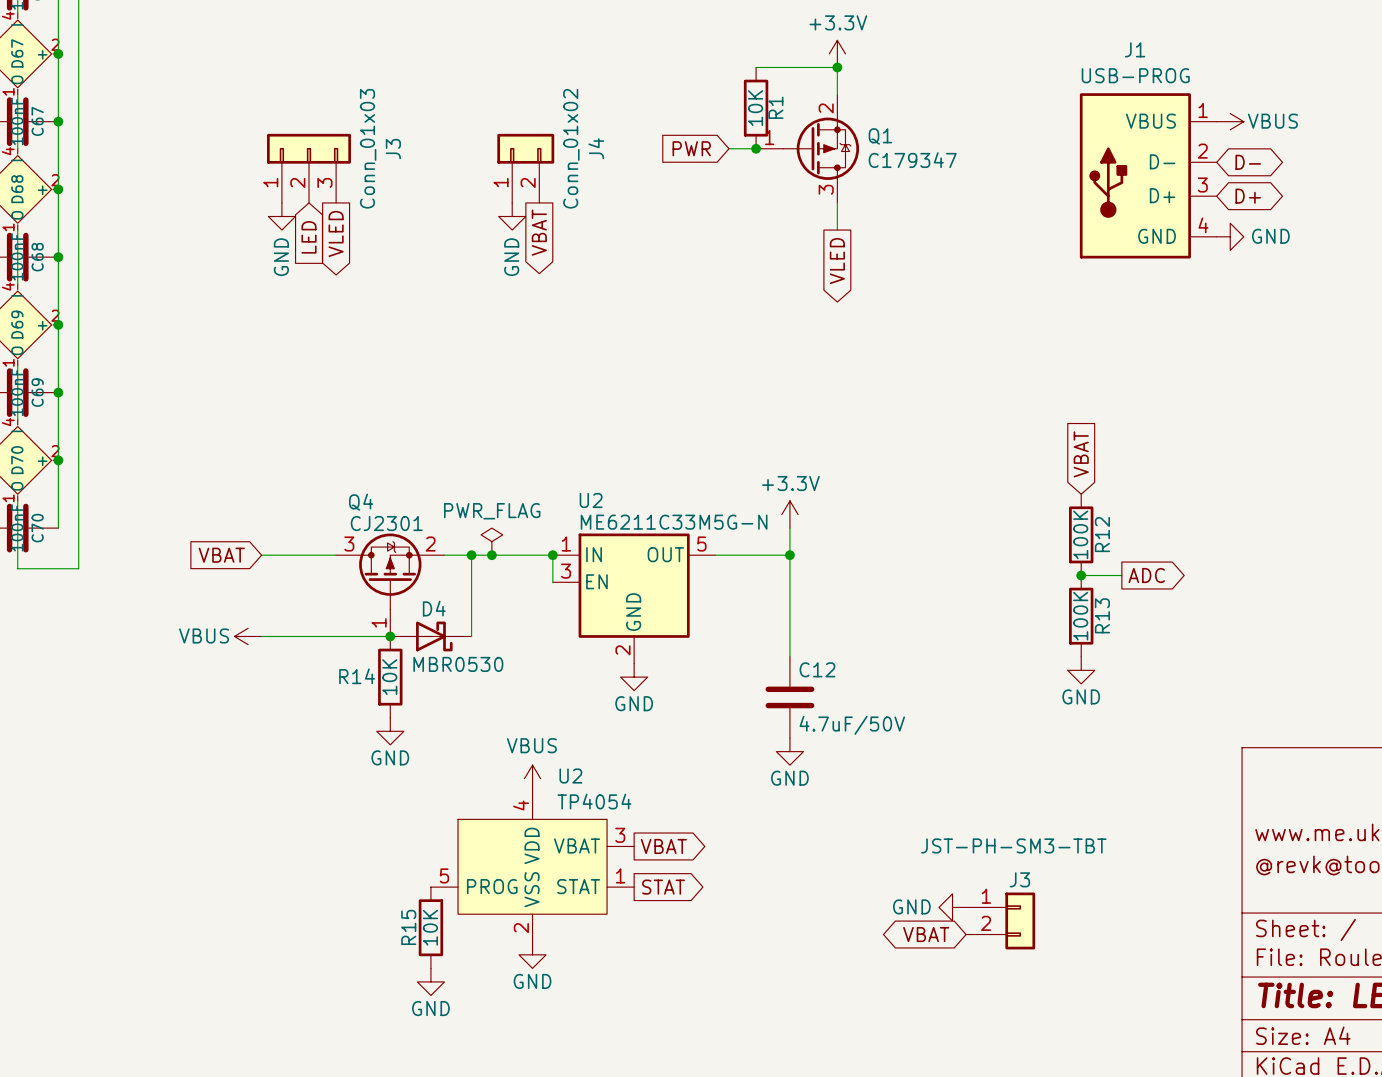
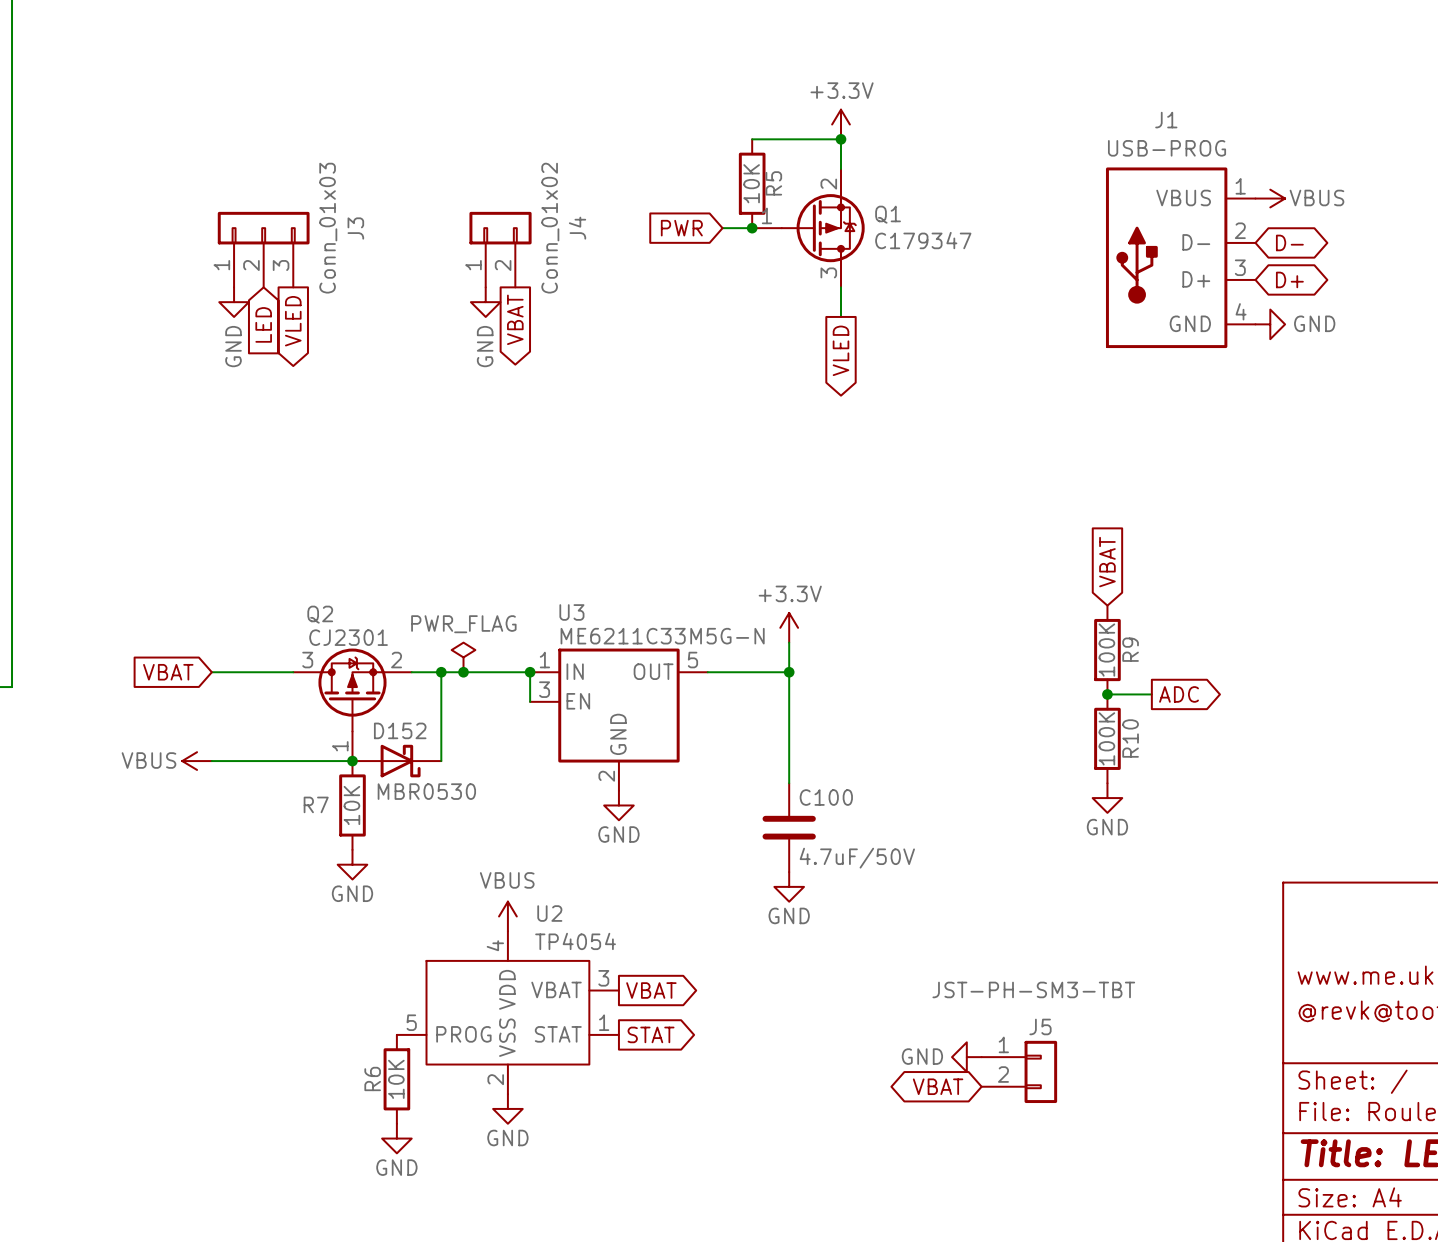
R1 name: R1 (775, 107) -> R5 (773, 183)
U2 name: U2 (591, 500) -> U3 (571, 612)
Q4 name: Q4 (361, 502) -> Q2 (320, 614)
R12 name: R12 (1102, 534) -> R9 (1130, 649)
D4 name: D4 (434, 608) -> D152 (400, 730)
R13 name: R13 (1102, 615) -> R10 (1130, 738)
C12 name: C12 (817, 669) -> C100 (826, 797)
R14 name: R14 (357, 676) -> R7 (316, 804)
J3 name: J3 (1019, 879) -> J5 (1040, 1026)
R15 name: R15 (408, 927) -> R6 (372, 1078)

